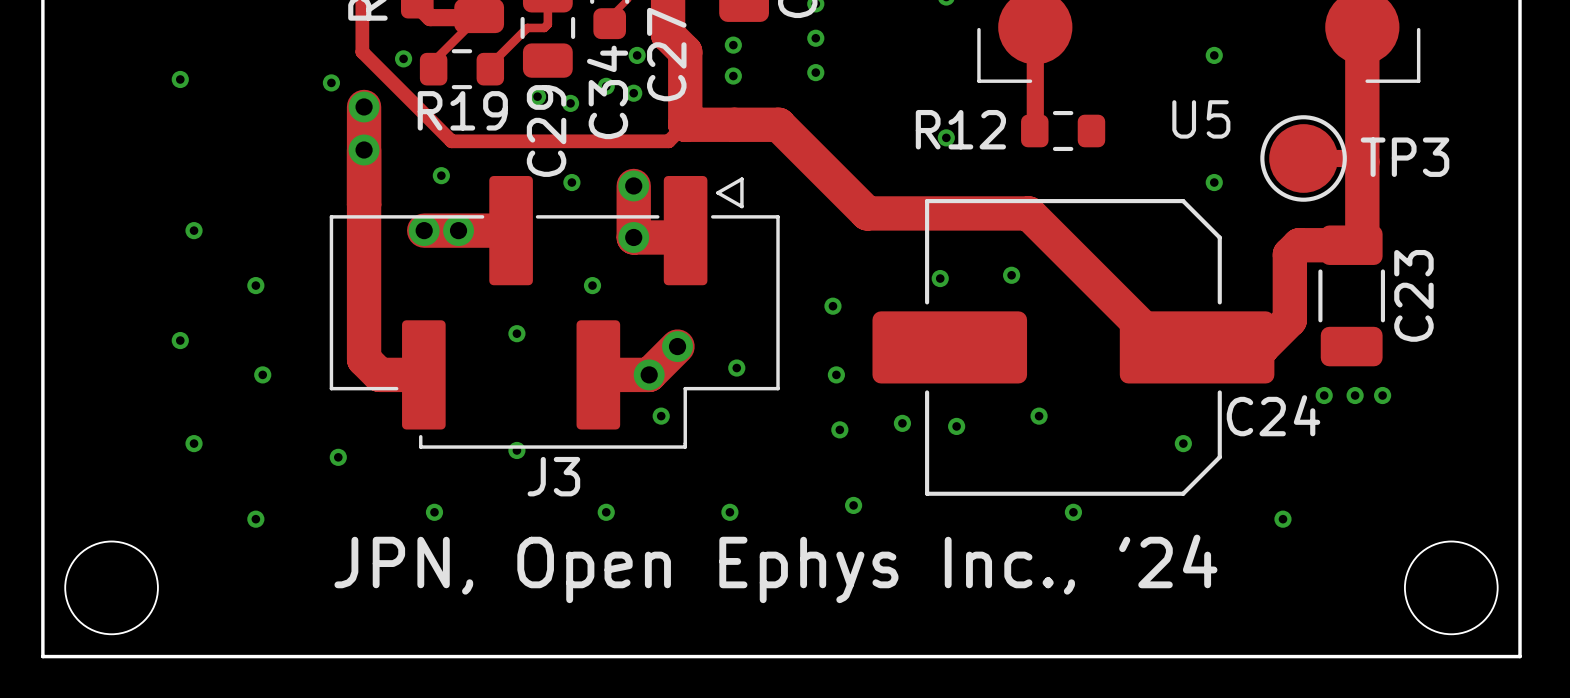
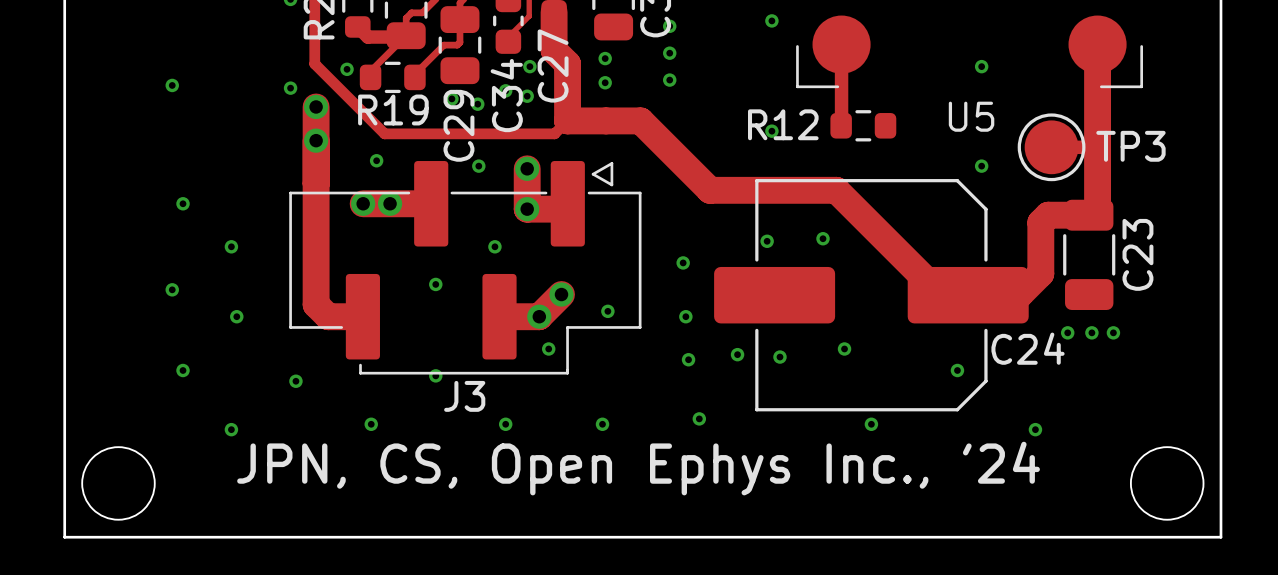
text: JPN, Open Ephys Inc., '24 (775, 568) -> JPN, CS, Open Ephys Inc., '24 (638, 468)

